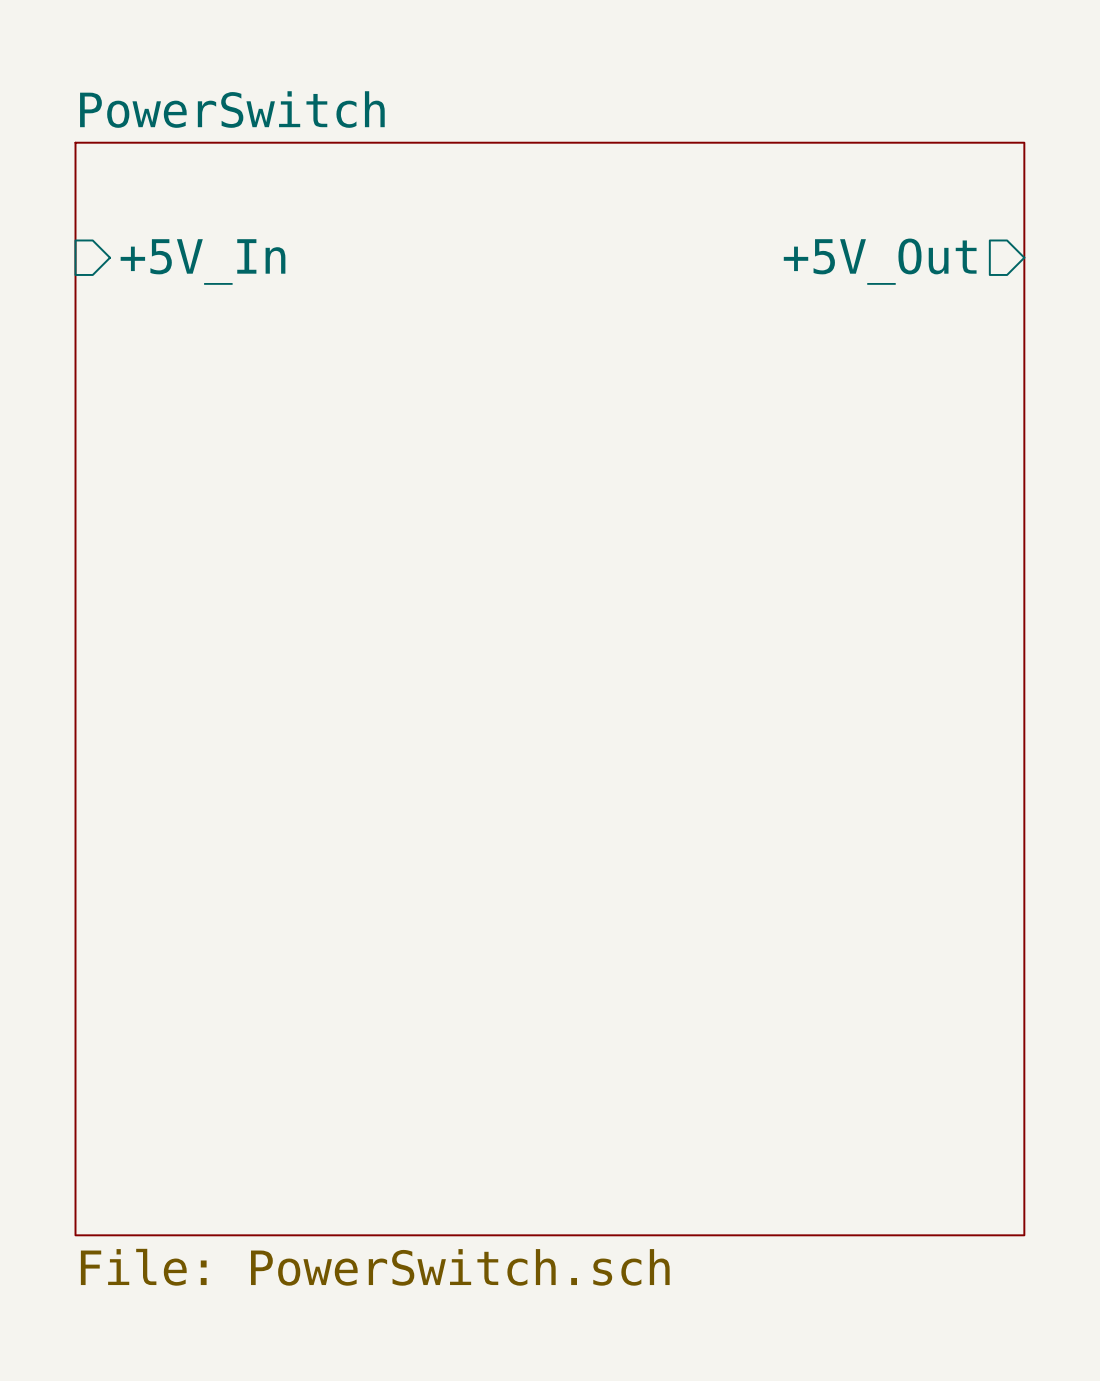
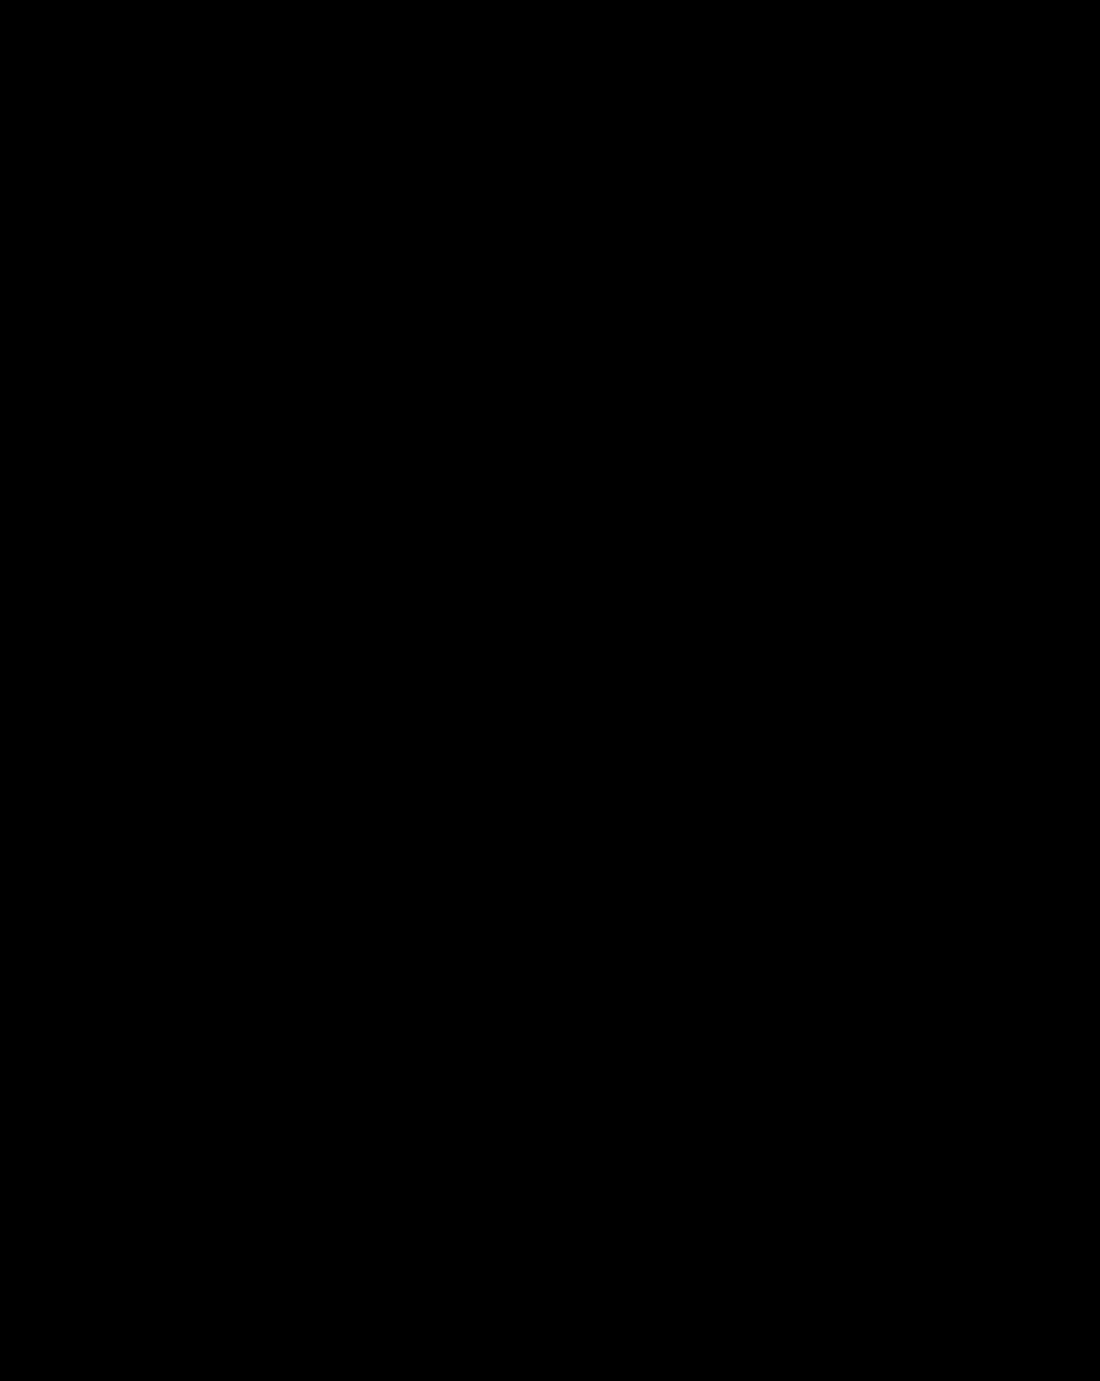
sheet pin: +5V_Out (880, 261) -> none
sheet pin: +5V_In (203, 262) -> none
sheet PowerSwitch: File: PowerSwitch.sch (549, 689) -> none

